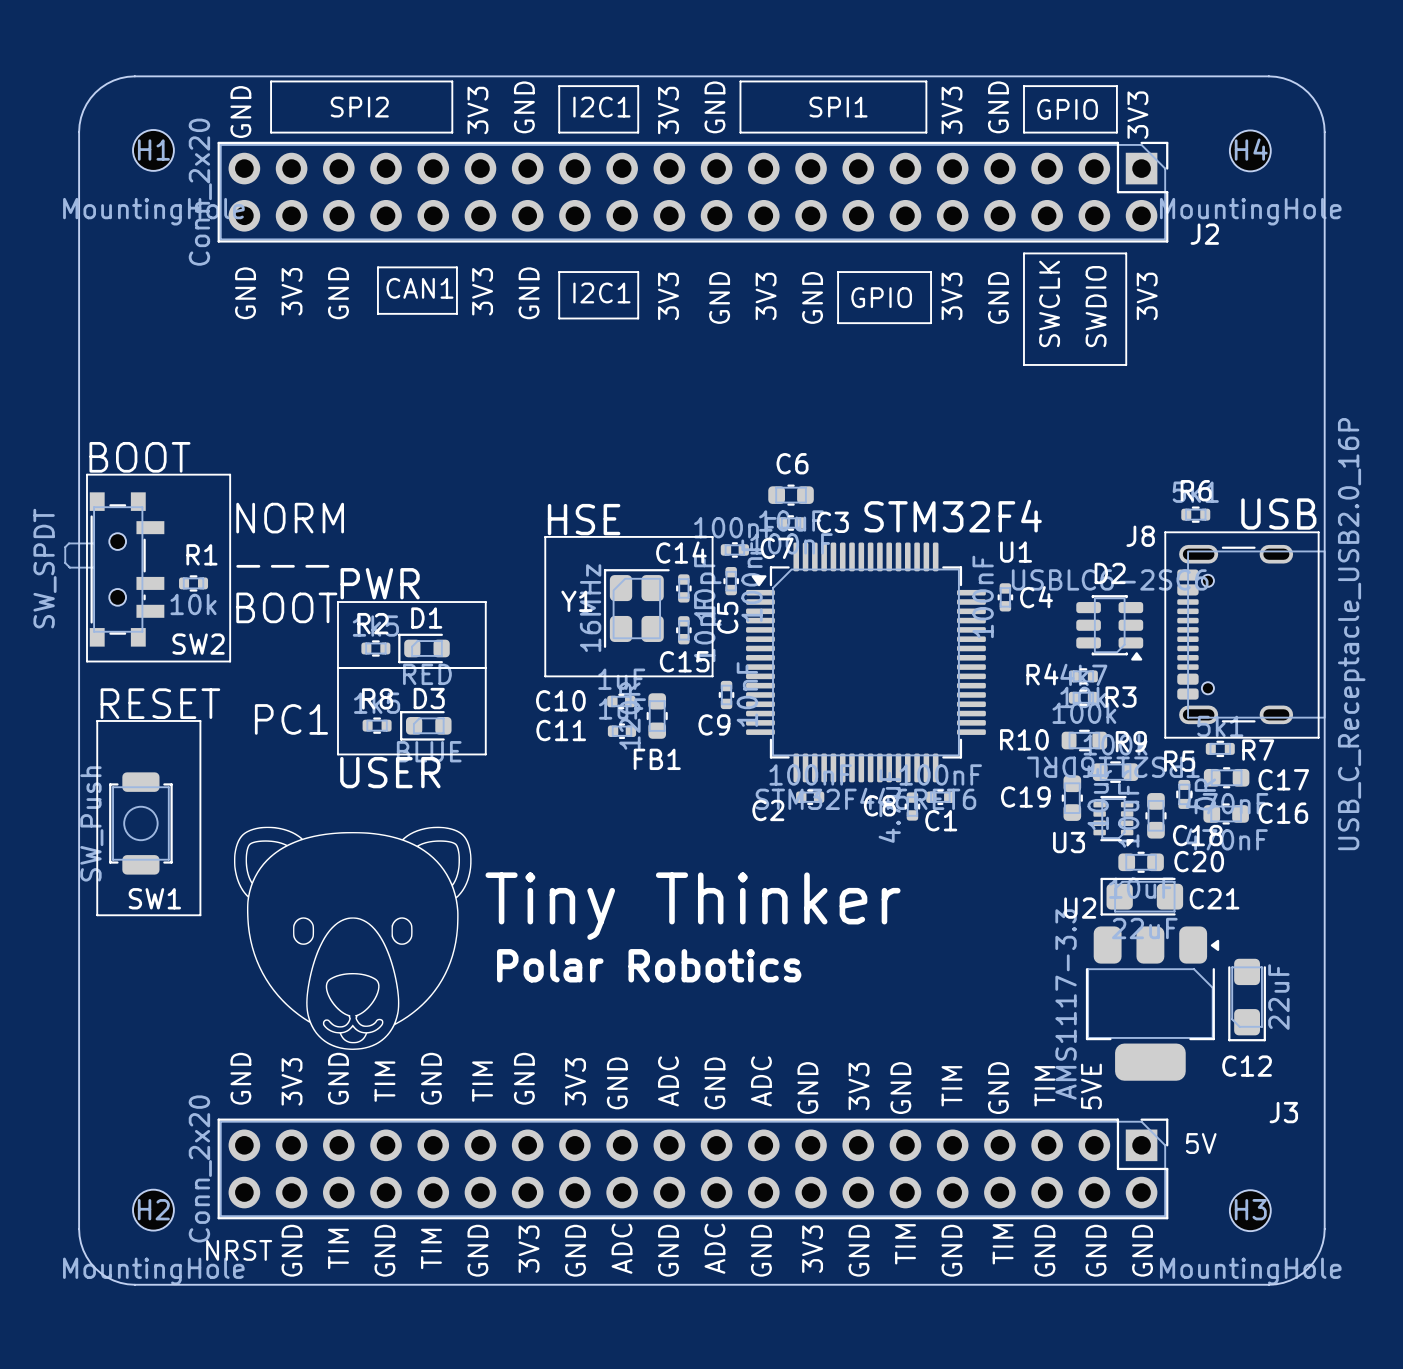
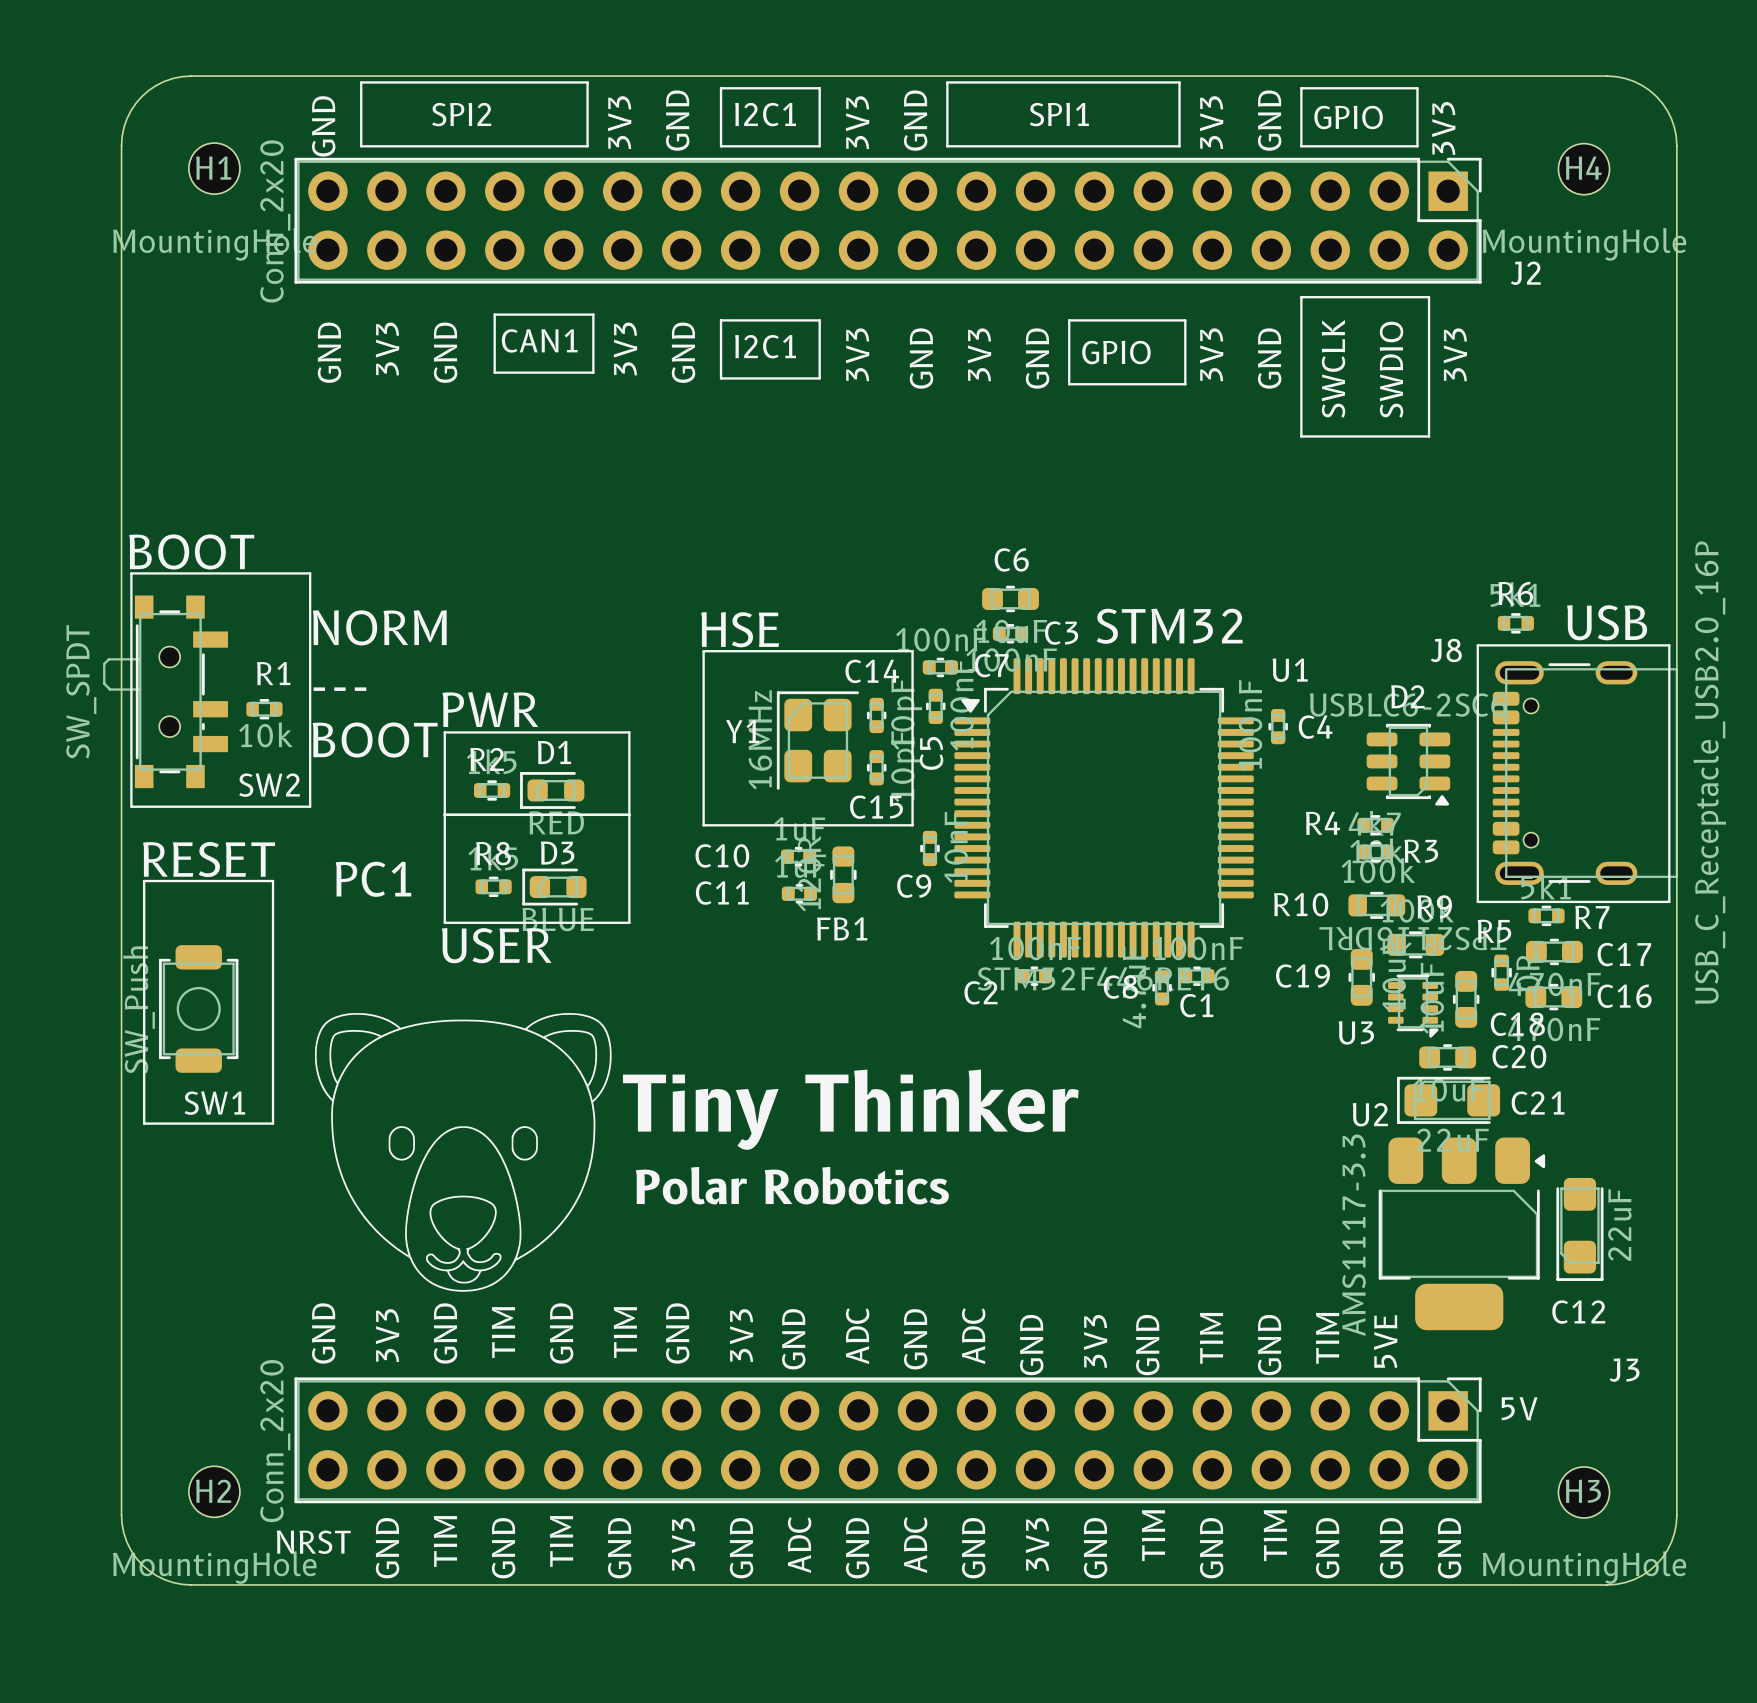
text: STM32F4 (953, 516) -> STM32 (1169, 626)

